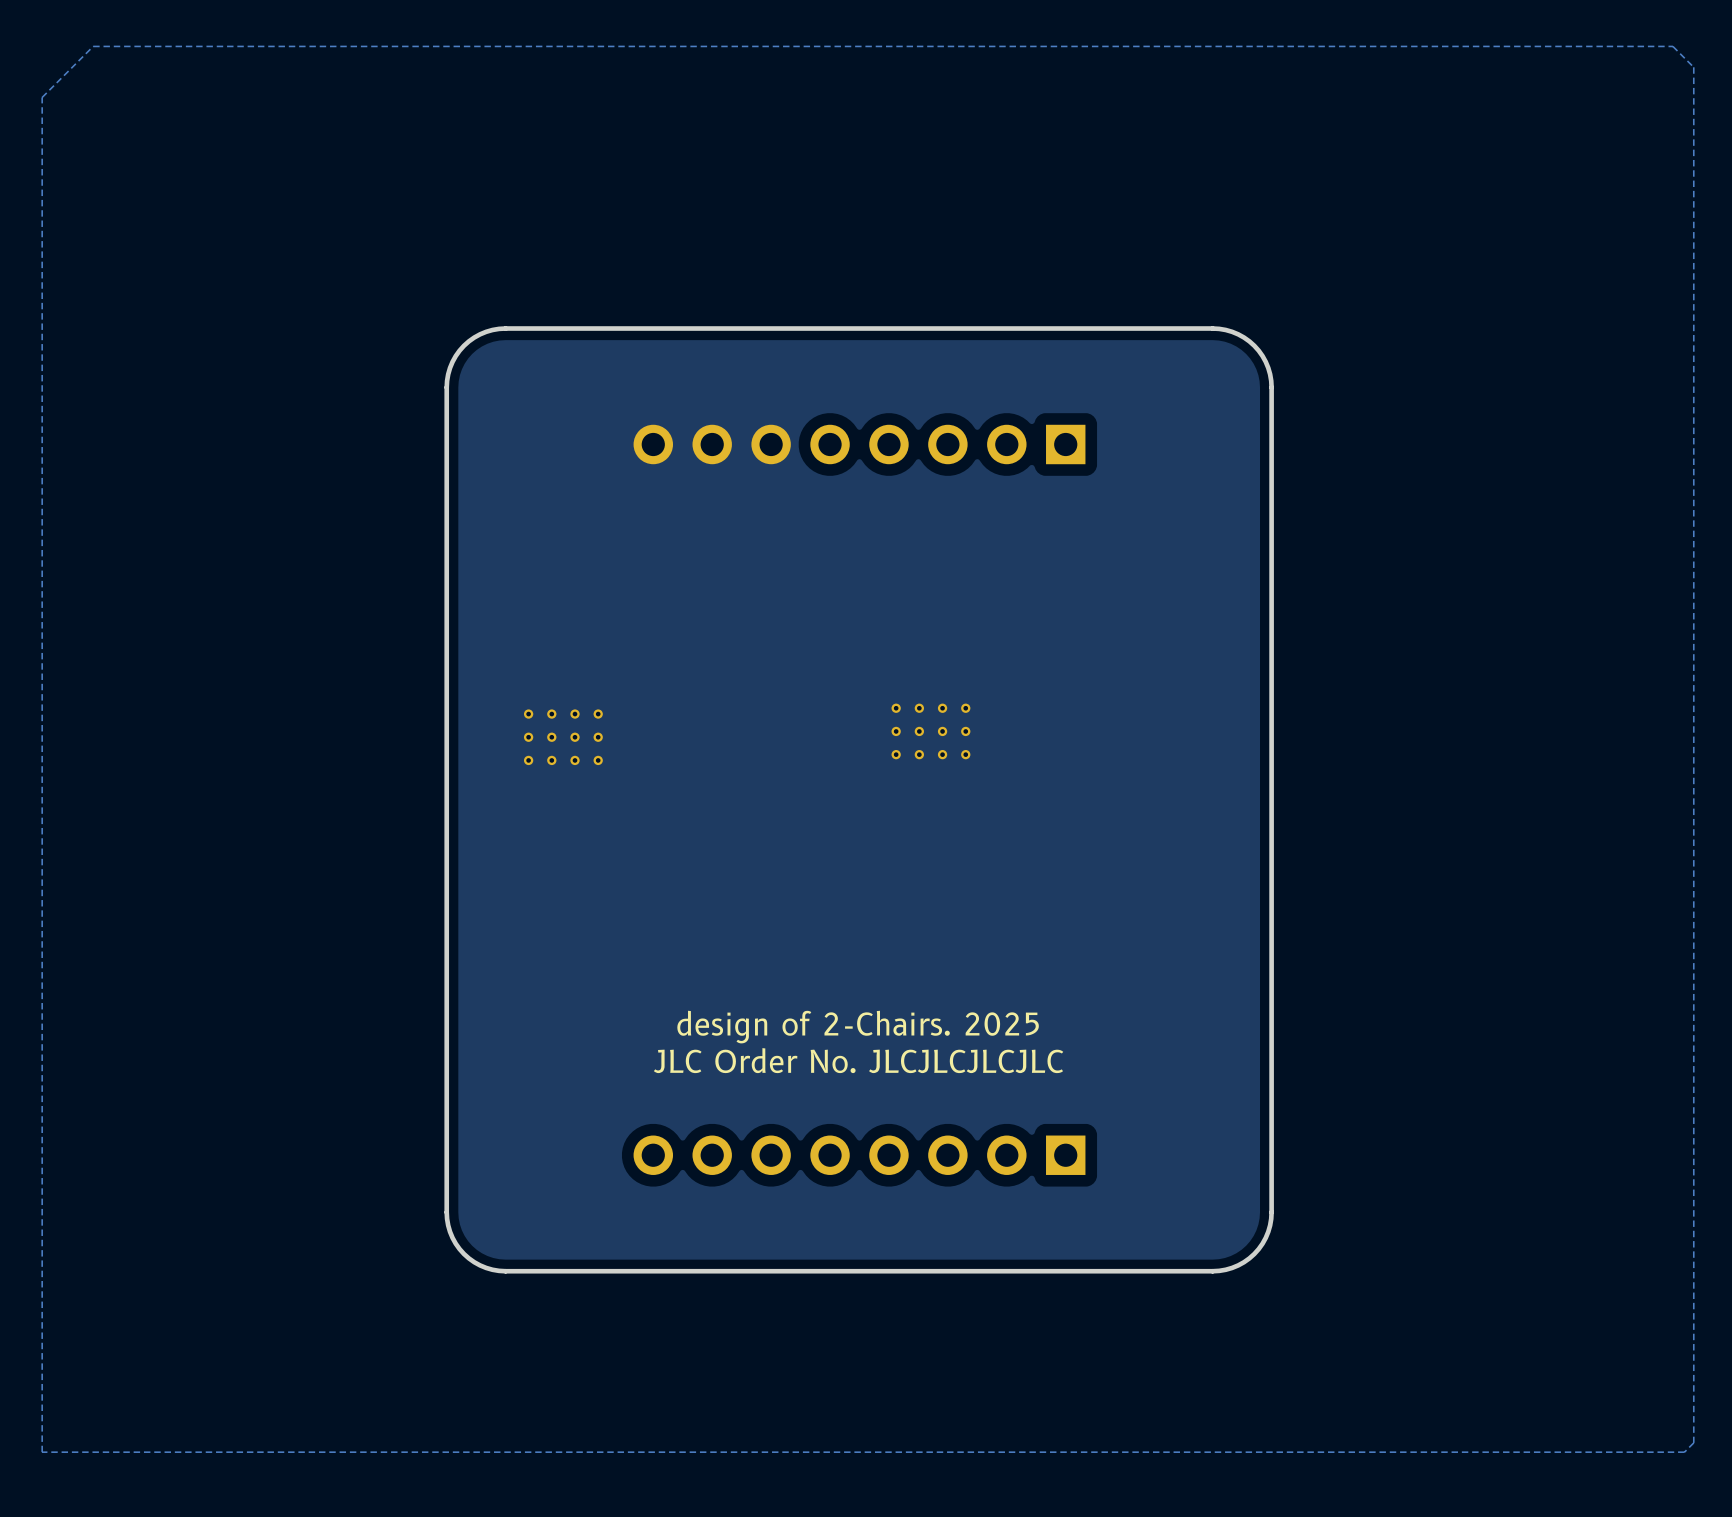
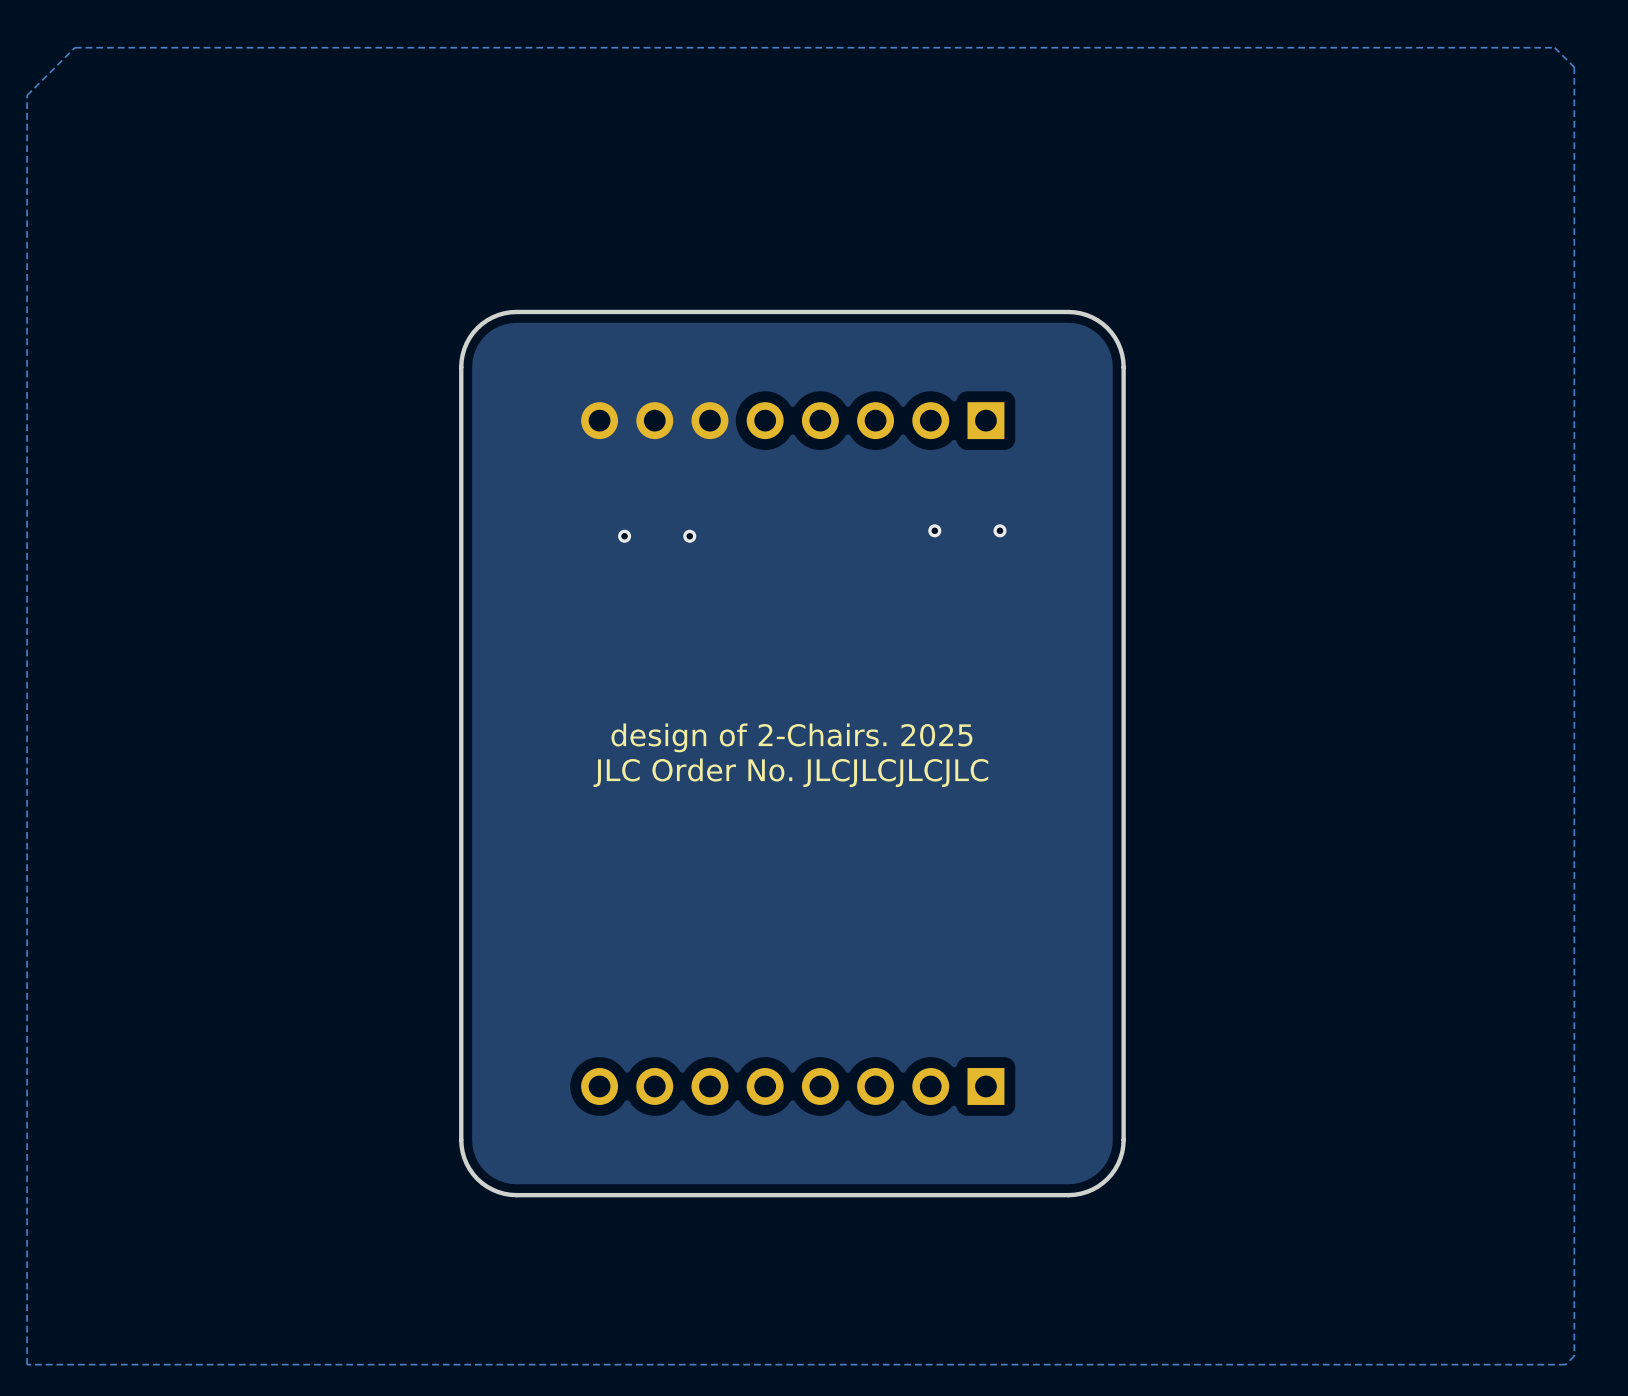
board edge: (564, 328) (499, 328) (480, 334) (468, 341) (455, 356) (448, 374) (446, 387) (447, 1218) (452, 1237) (459, 1249) (480, 1265) (499, 1270) (564, 1271) -> (516, 311) (498, 315) (477, 328) (466, 343) (461, 367) (461, 1146) (469, 1169) (482, 1183) (498, 1192) (516, 1195)
board edge: (1153, 328) (1219, 328) (1238, 334) (1254, 345) (1262, 356) (1268, 367) (1271, 387) (1271, 1218) (1262, 1243) (1249, 1258) (1238, 1265) (1219, 1270) (1153, 1271) -> (1068, 311) (1086, 315) (1107, 328) (1118, 343) (1123, 367) (1123, 1146) (1118, 1163) (1107, 1178) (1092, 1189) (1068, 1195)
via: none -> (934, 530)
via: none -> (999, 530)
via: none -> (624, 536)
via: none -> (689, 536)
part: (930, 731) -> none
part: (563, 737) -> none
text position: design of 2-Chairs. 2025 (858, 1027) -> design of 2-Chairs. 2025 (791, 737)
text position: JLC Order No. JLCJLCJLCJLC (858, 1060) -> JLC Order No. JLCJLCJLCJLC (790, 772)

